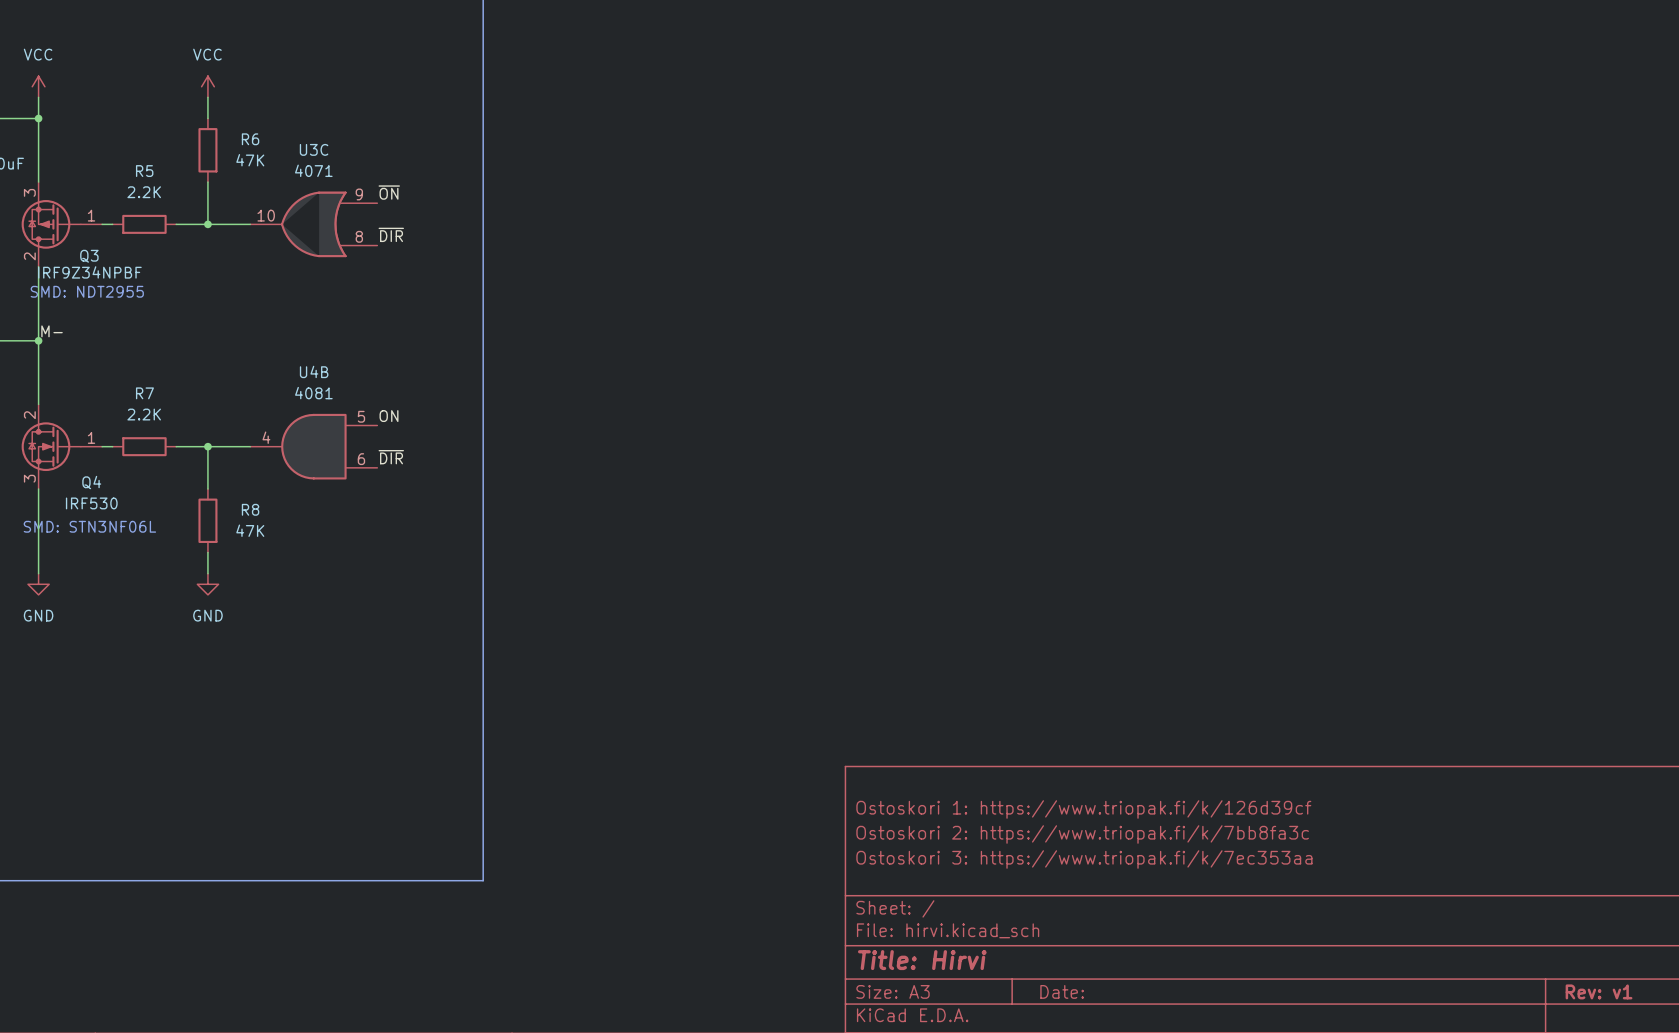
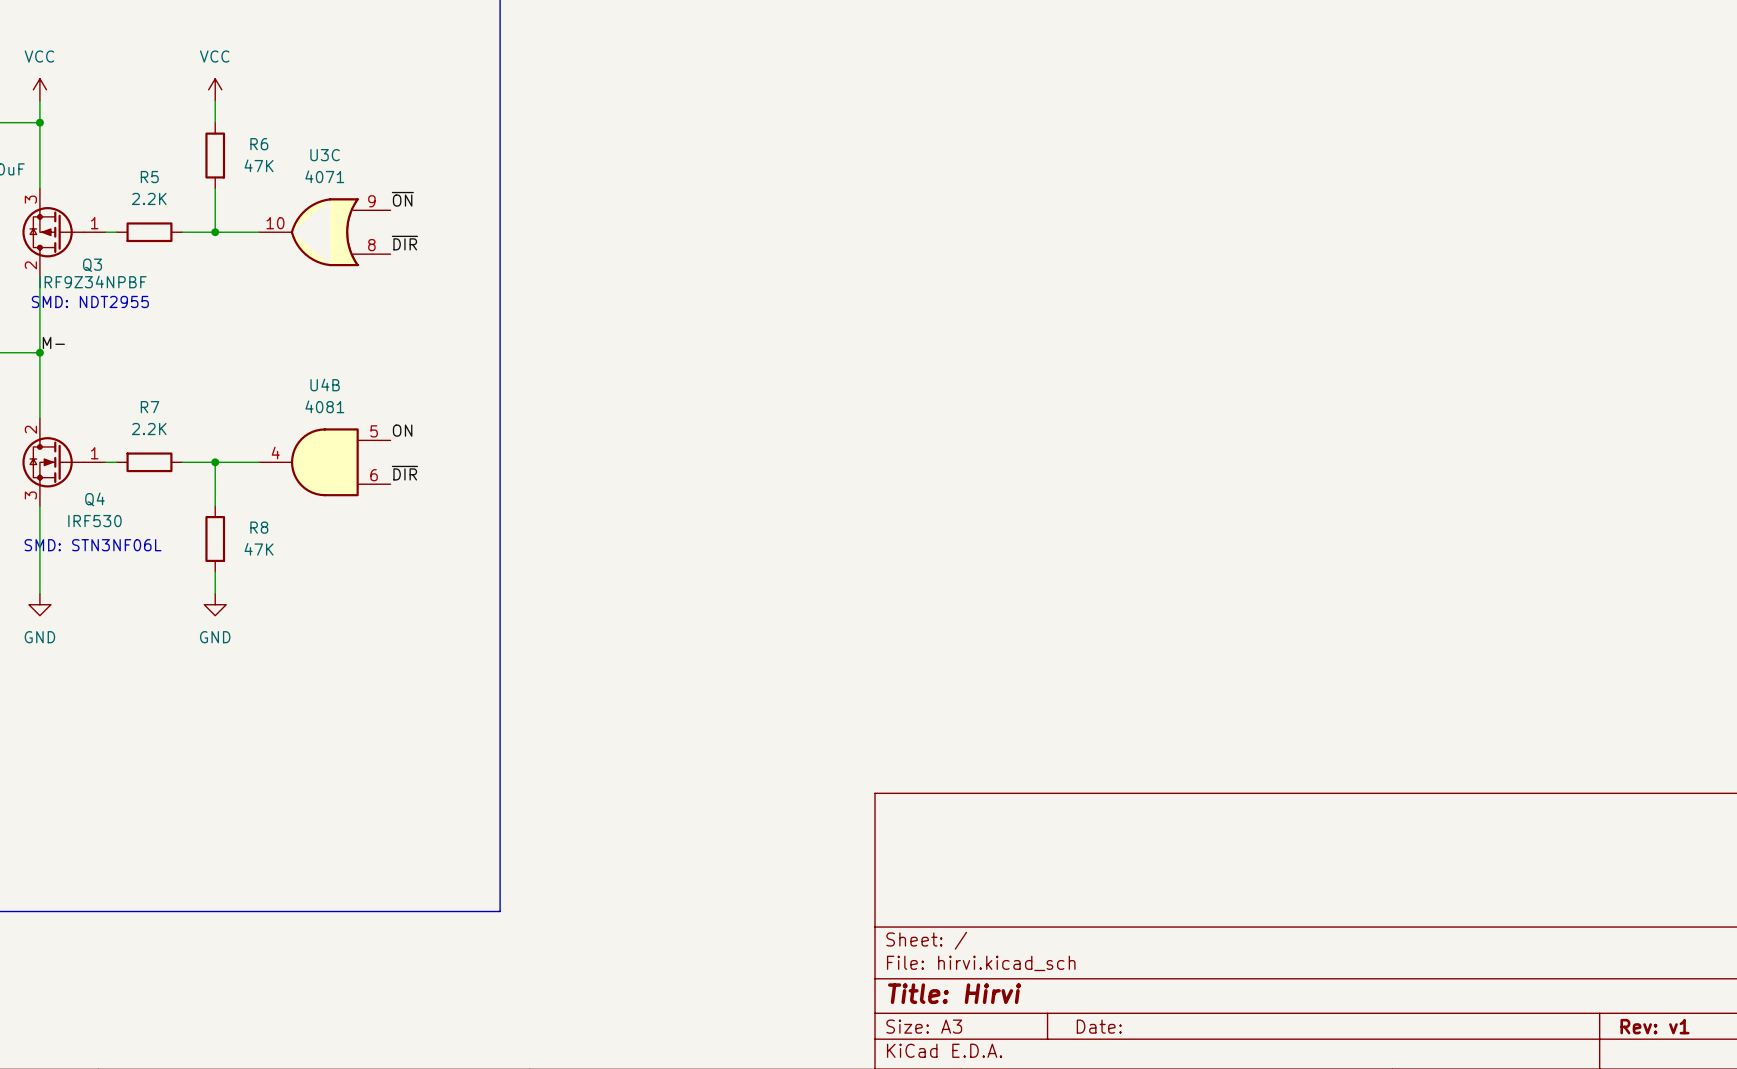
title block: Ostoskori 1: https://www.triopak.fi/k/126d39cf (1083, 809) -> none
title block: Ostoskori 2: https://www.triopak.fi/k/7bb8fa3c (1082, 834) -> none
title block: Ostoskori 3: https://www.triopak.fi/k/7ec353aa (1084, 859) -> none

